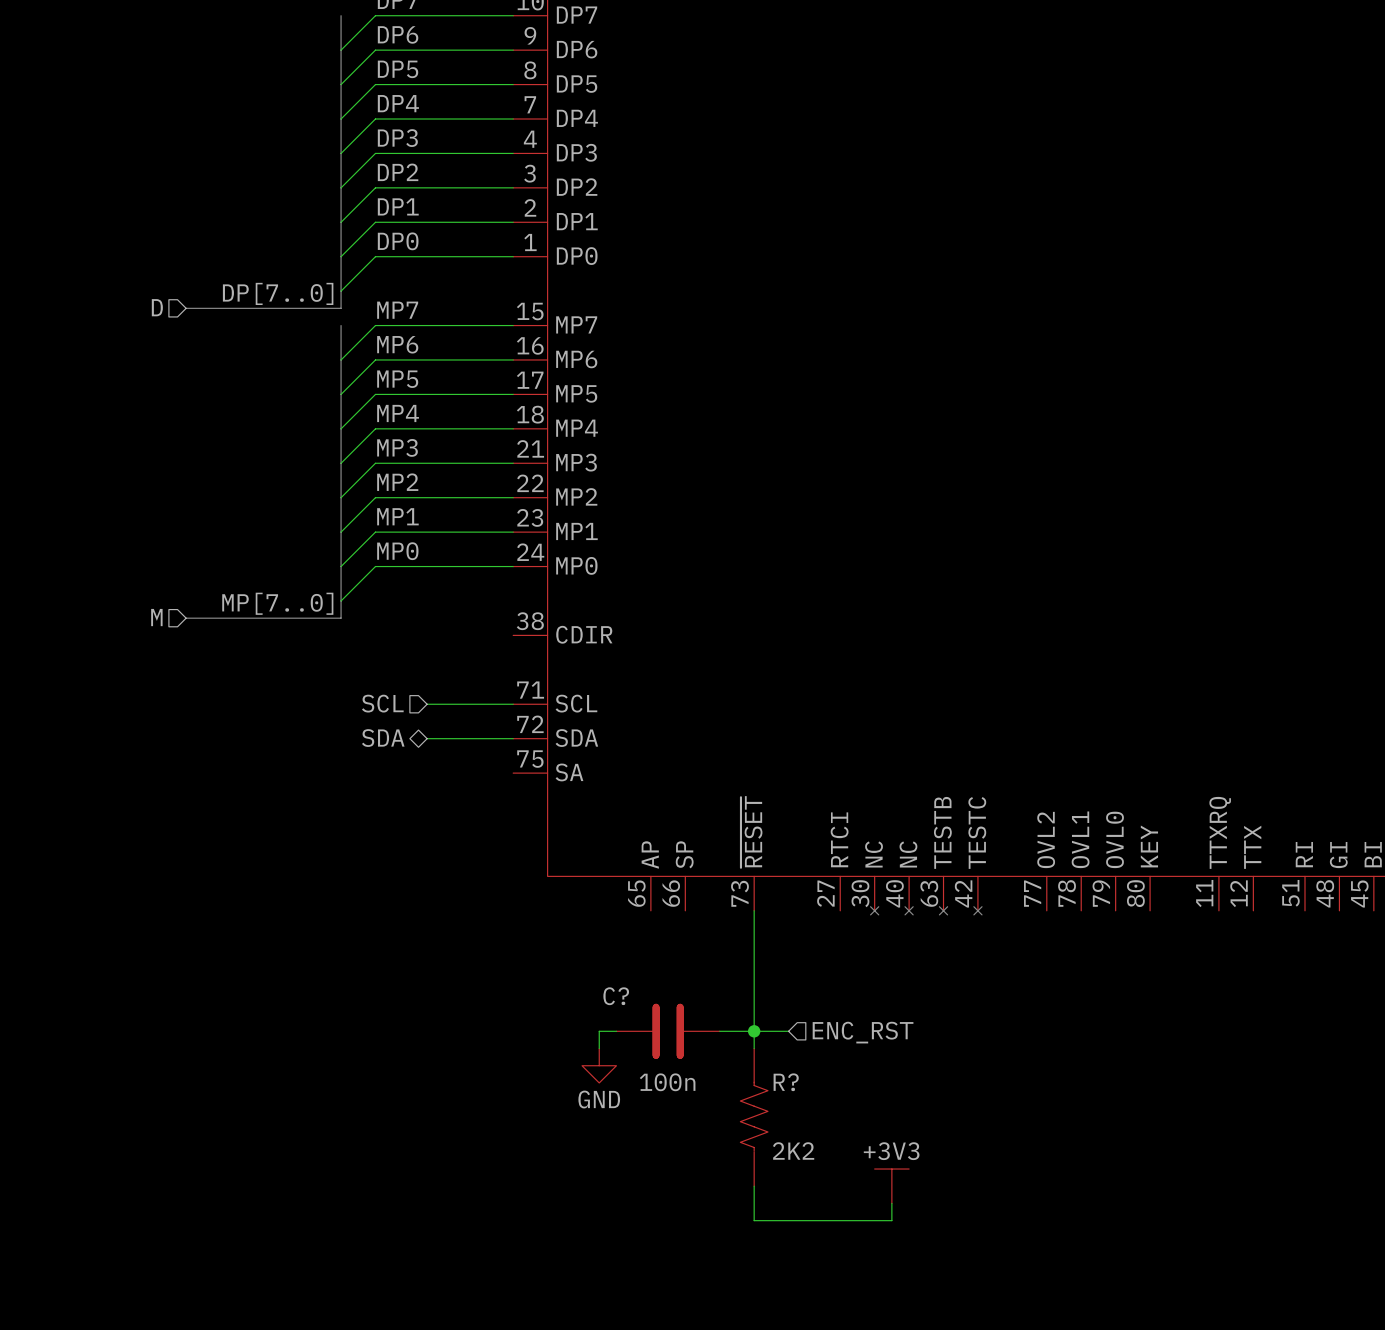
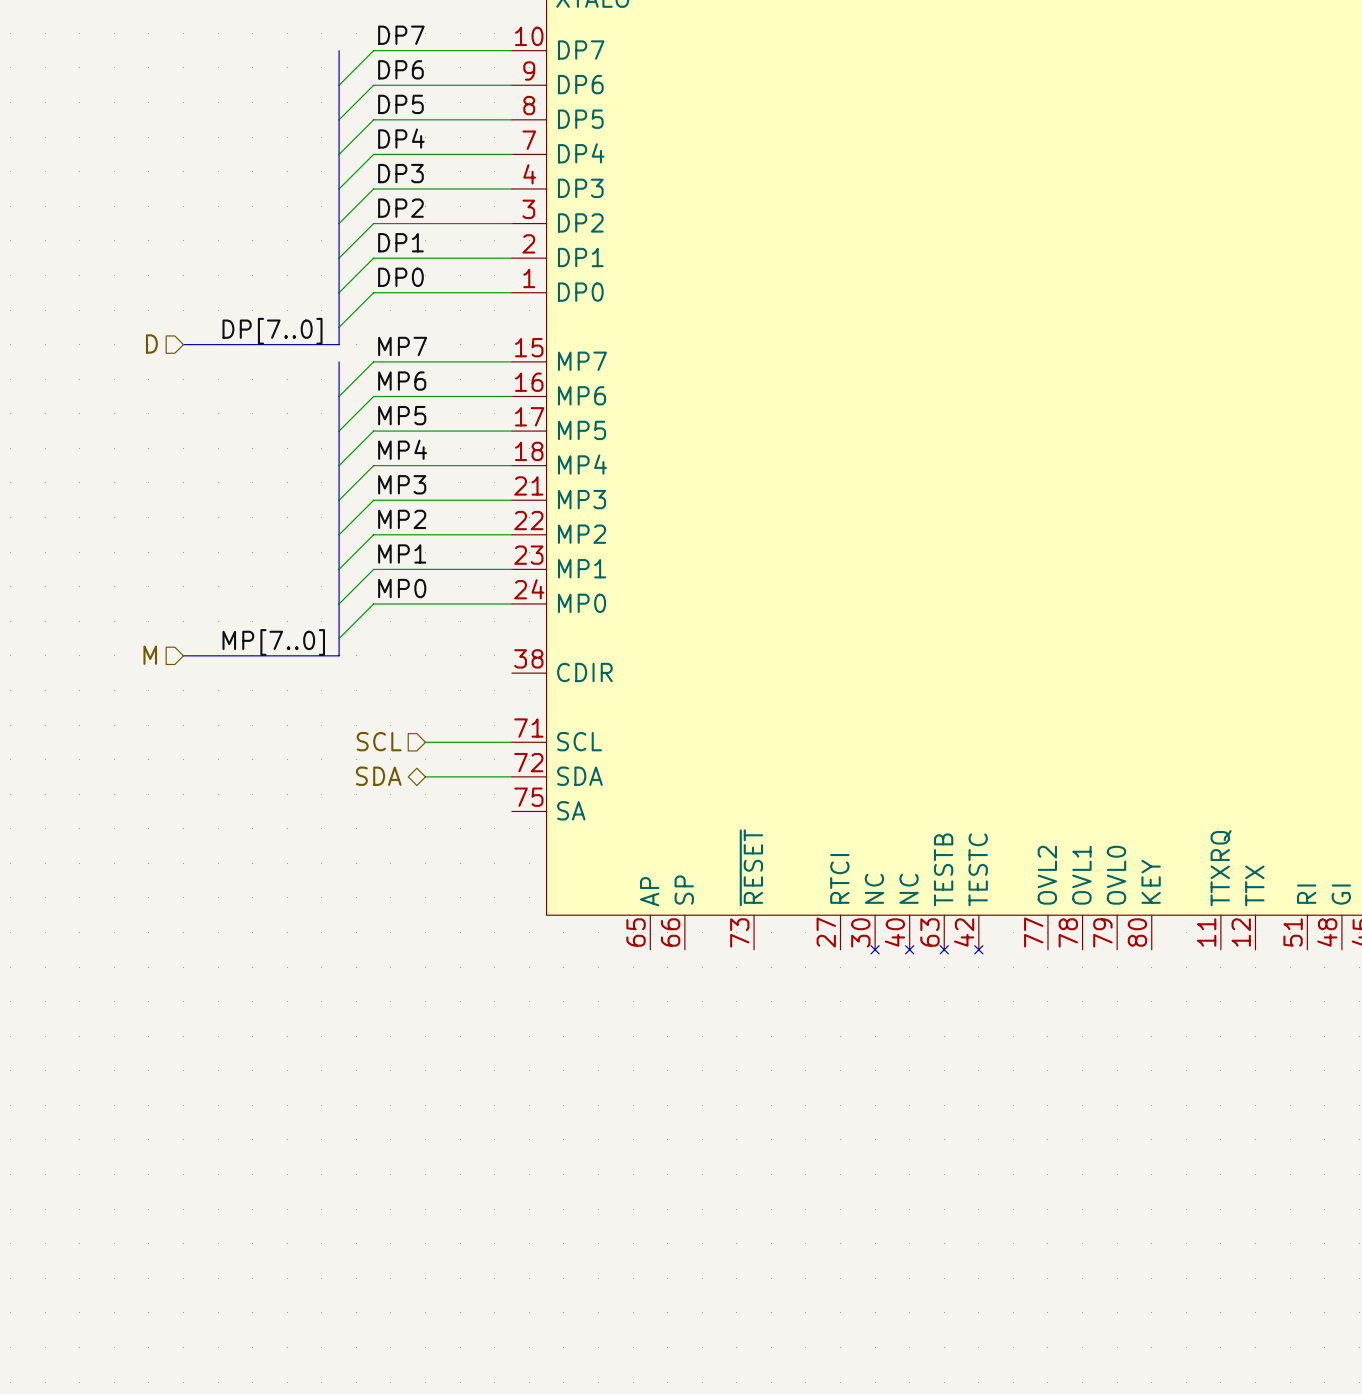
wire: (754, 910) (754, 1048) -> none
wire: (616, 1031) (599, 1031) (599, 1048) -> none
C?: 100n (668, 1031) -> none
wire: (719, 1031) (788, 1031) -> none
junction: (754, 1031) -> none
hierarchical label: ENC_RST (863, 1032) -> none
power symbol: GND (599, 1065) -> none
R?: 2K2 (754, 1117) -> none
wire: (754, 1186) (754, 1220) (891, 1220) (891, 1203) -> none
power symbol: +3V3 (891, 1186) -> none

